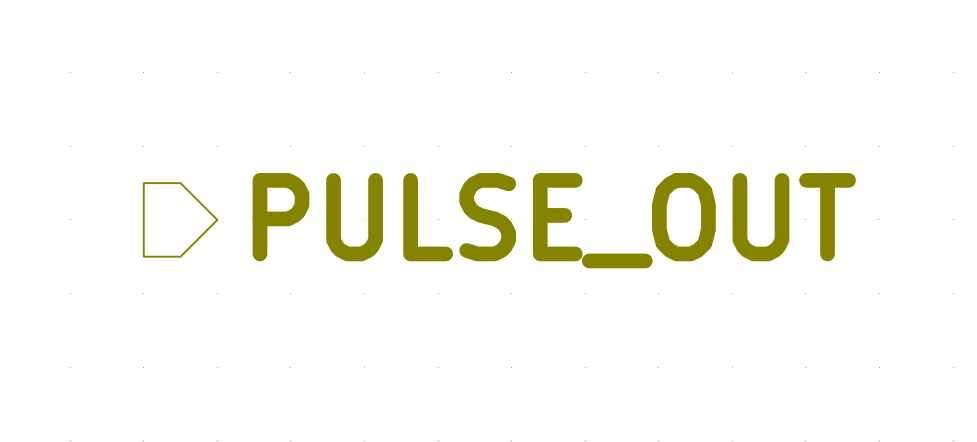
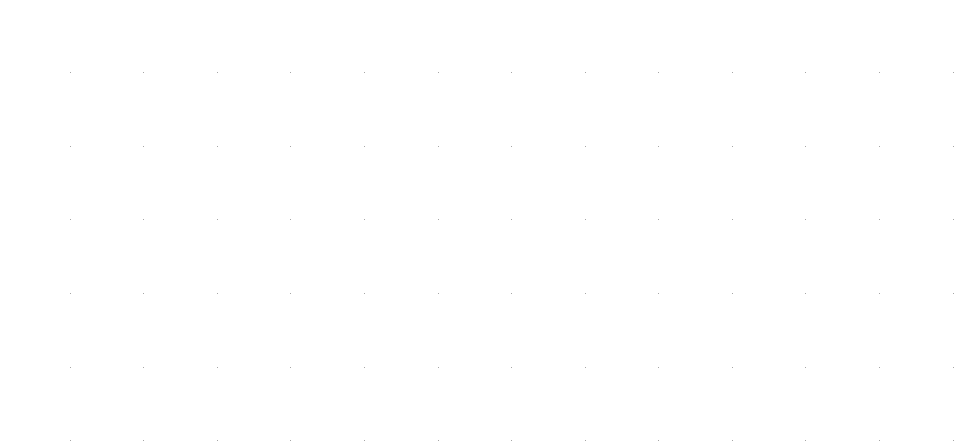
hierarchical label: PULSE_OUT (554, 220) -> none

